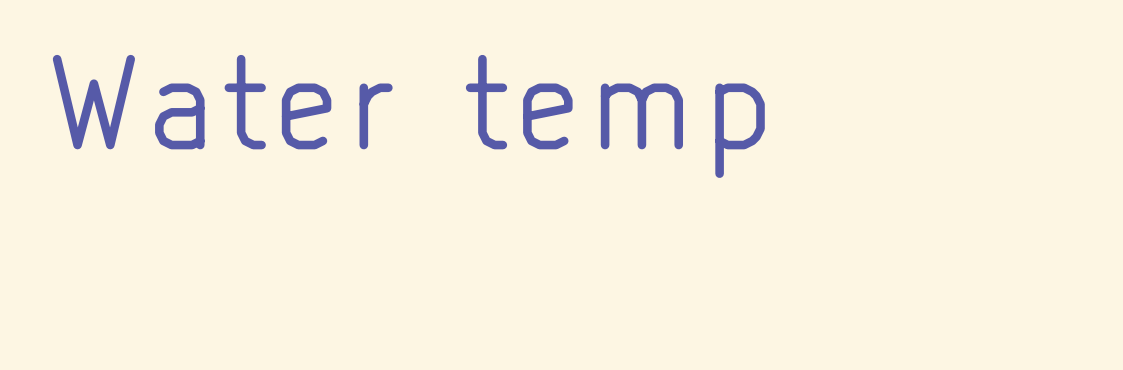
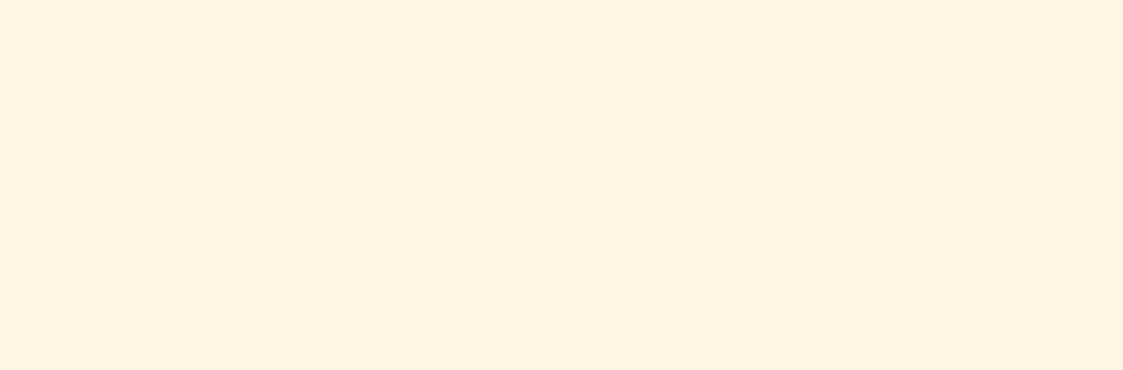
text: Water temp (408, 116) -> none

